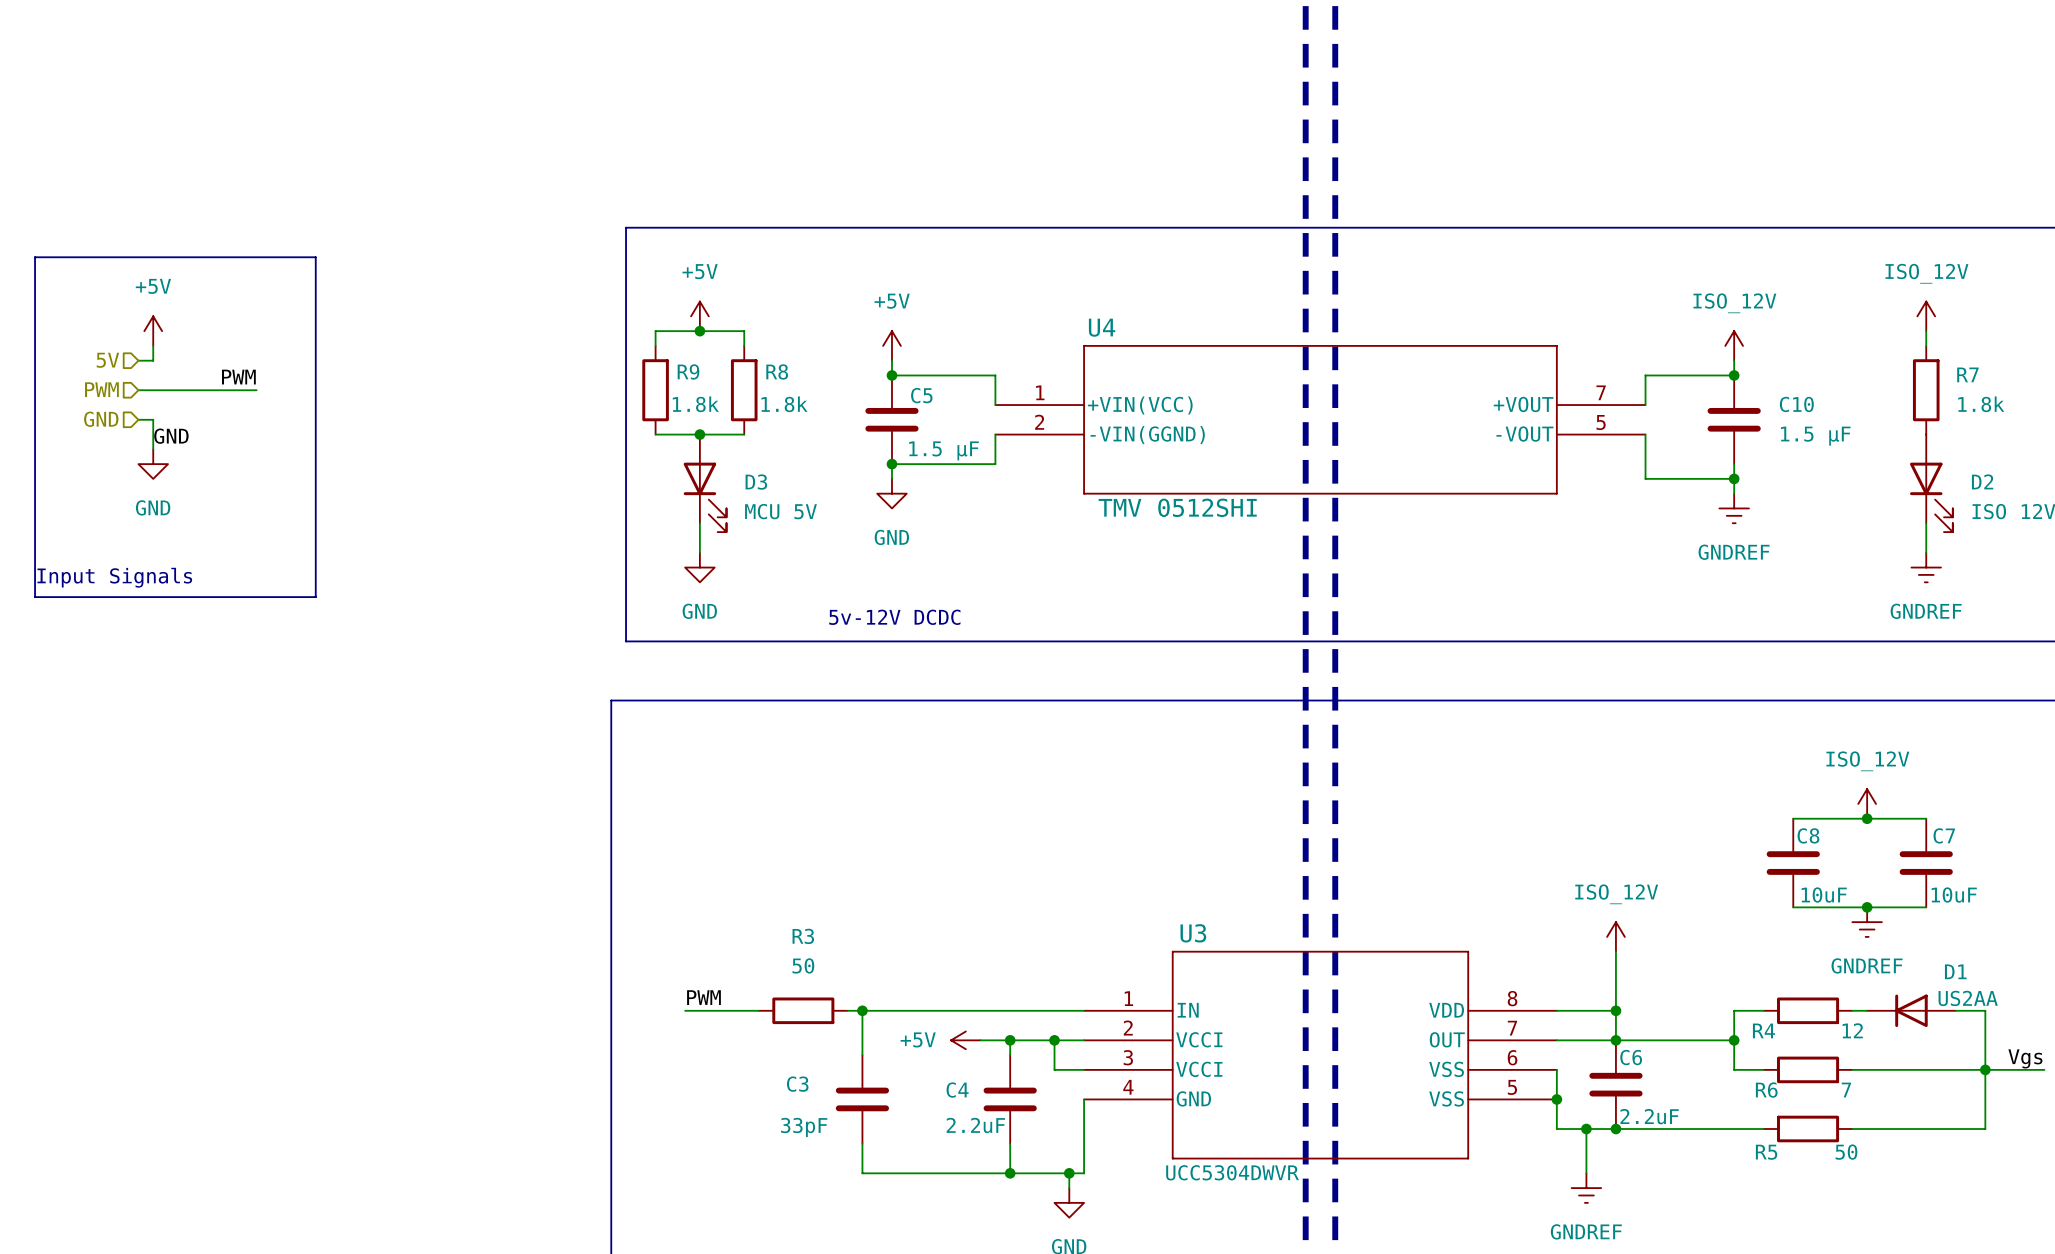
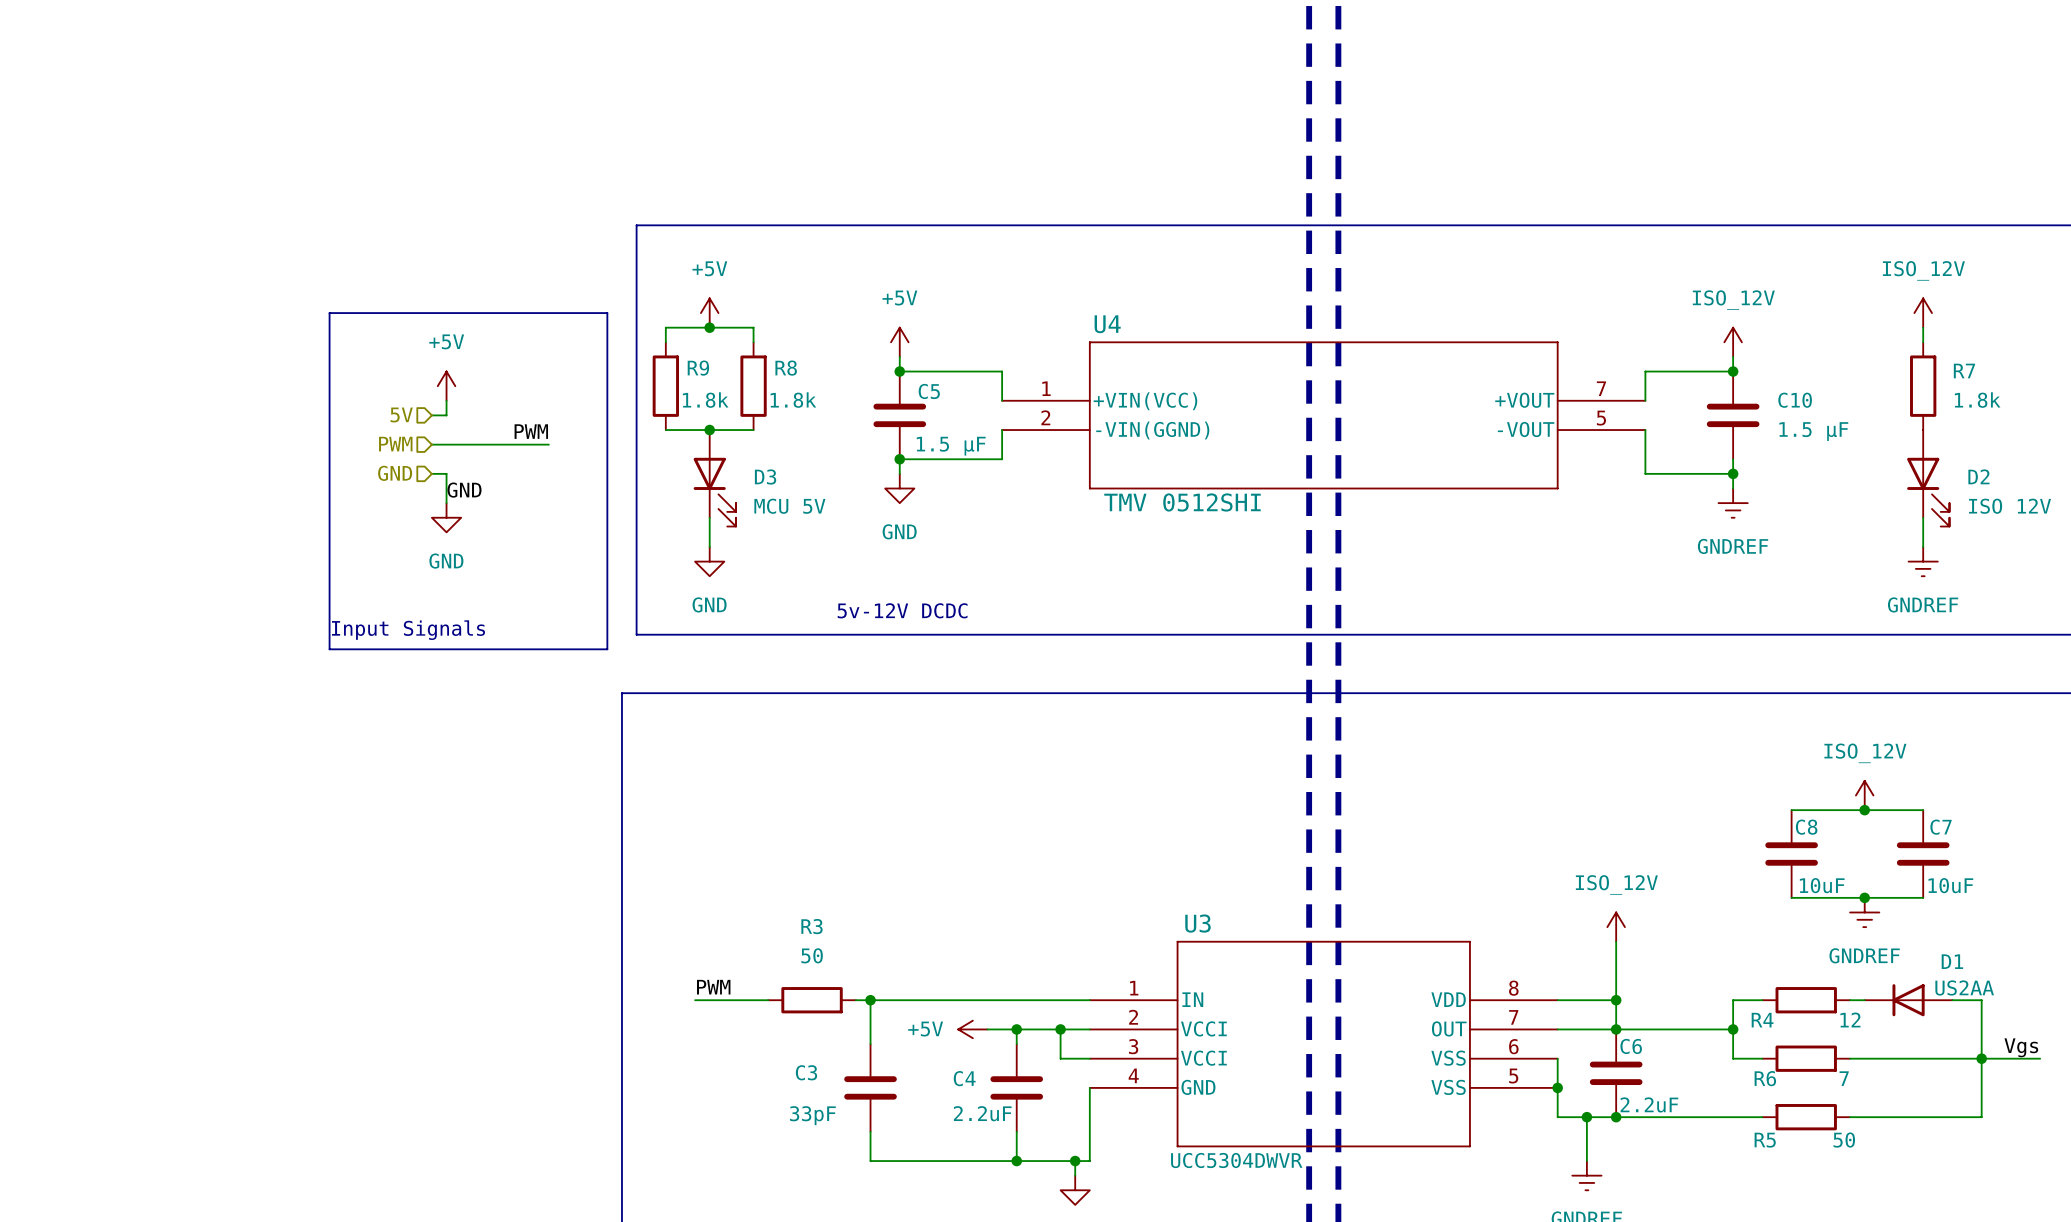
line: (315, 316) (315, 257) (35, 257) (35, 597) (315, 597) -> (329, 313) (607, 313) (607, 649) (329, 649) (329, 590)
power symbol position: +5V (153, 331) -> +5V (446, 386)
wire: (153, 345) (153, 360) (138, 360) -> (446, 400) (446, 415) (431, 415)
hierarchical label position: 5V (107, 360) -> 5V (401, 414)
label position: PWM (238, 377) -> PWM (531, 431)
hierarchical label position: PWM (101, 389) -> PWM (395, 444)
wire: (138, 390) (256, 390) -> (431, 444) (548, 444)
hierarchical label position: GND (101, 419) -> GND (395, 473)
wire: (138, 419) (153, 419) (153, 449) -> (431, 473) (446, 473) (446, 503)
label position: GND (171, 436) -> GND (464, 490)
power symbol position: GND (153, 464) -> GND (446, 517)
text position: Input Signals (114, 577) -> Input Signals (408, 630)

